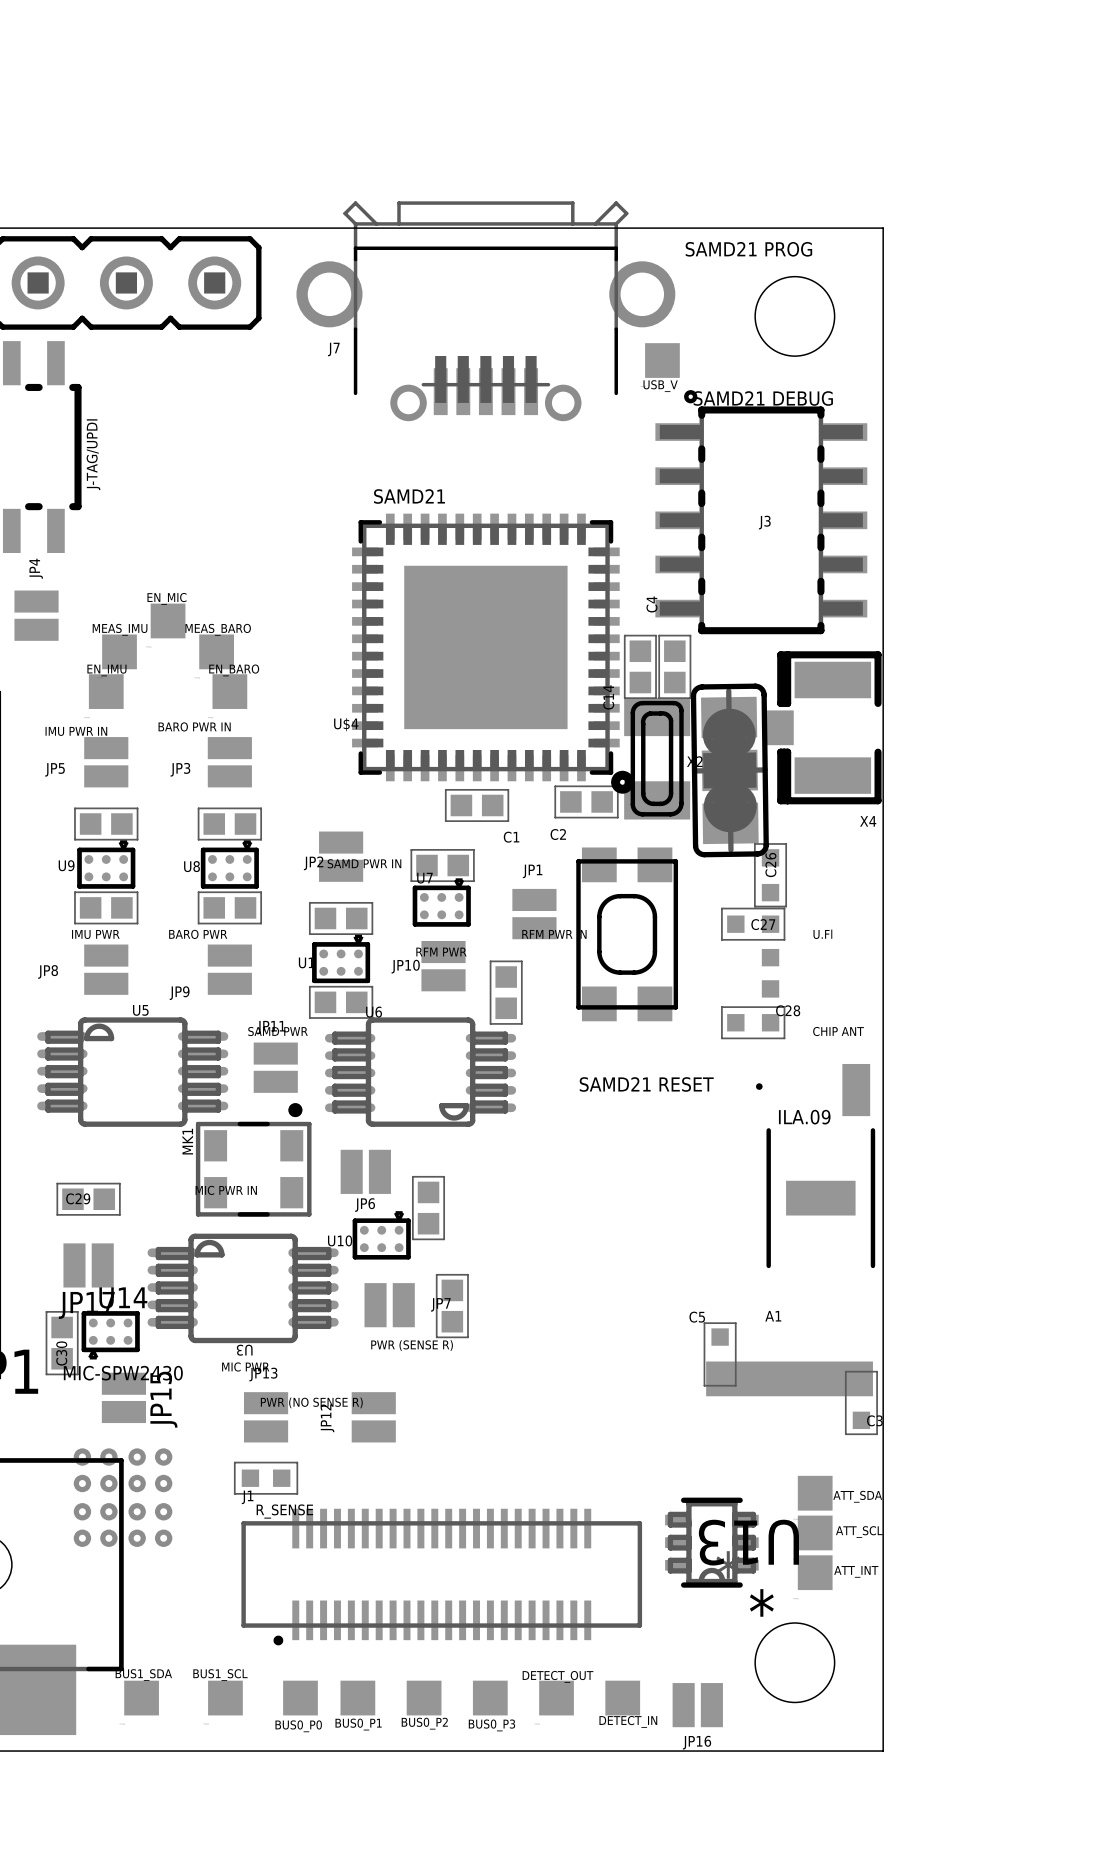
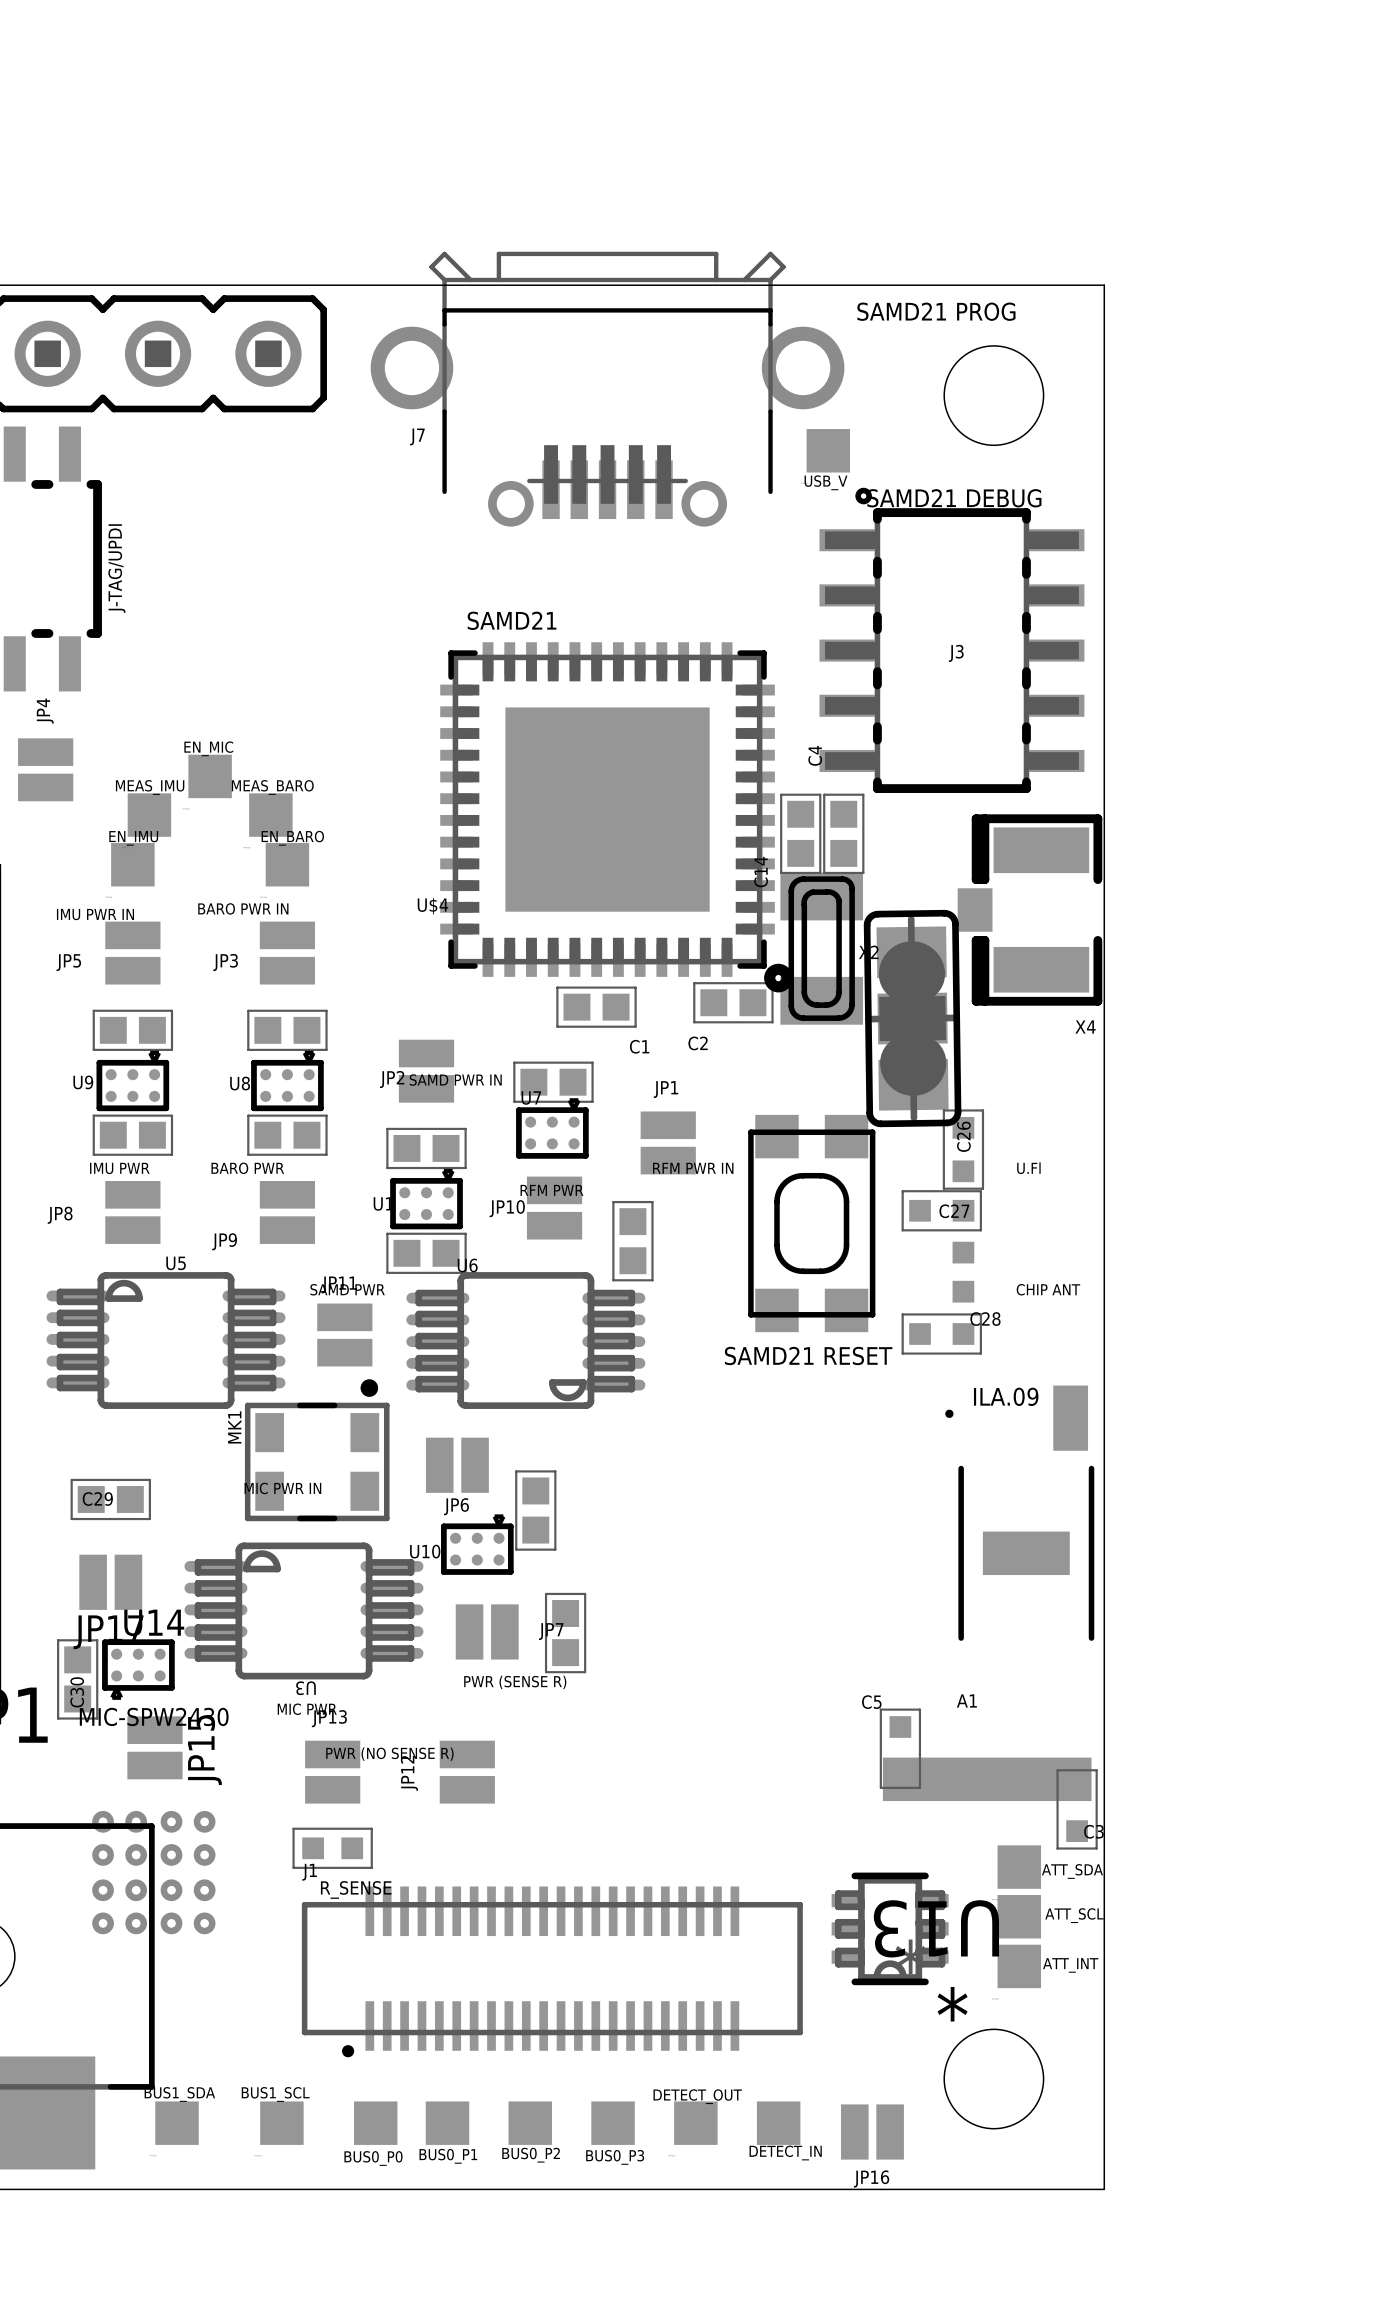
part position: (729, 770) -> (912, 1018)
C26 position: (770, 875) -> (963, 1149)
C27 position: (753, 924) -> (941, 1210)
part position: (627, 934) -> (811, 1223)
part position: (770, 973) -> (963, 1272)
C28 position: (753, 1022) -> (941, 1334)
A1 position: (790, 1230) -> (988, 1593)
C5 position: (720, 1354) -> (900, 1748)
C3 position: (861, 1402) -> (1077, 1809)

